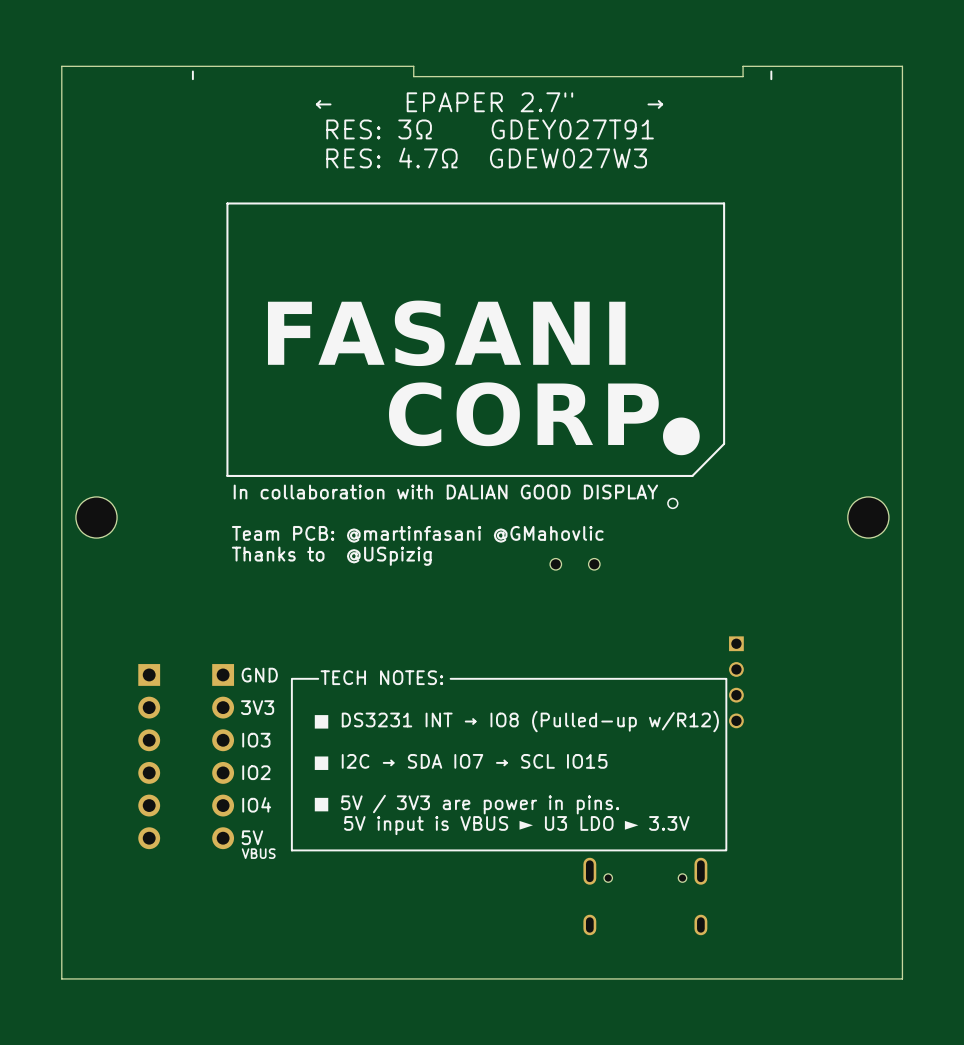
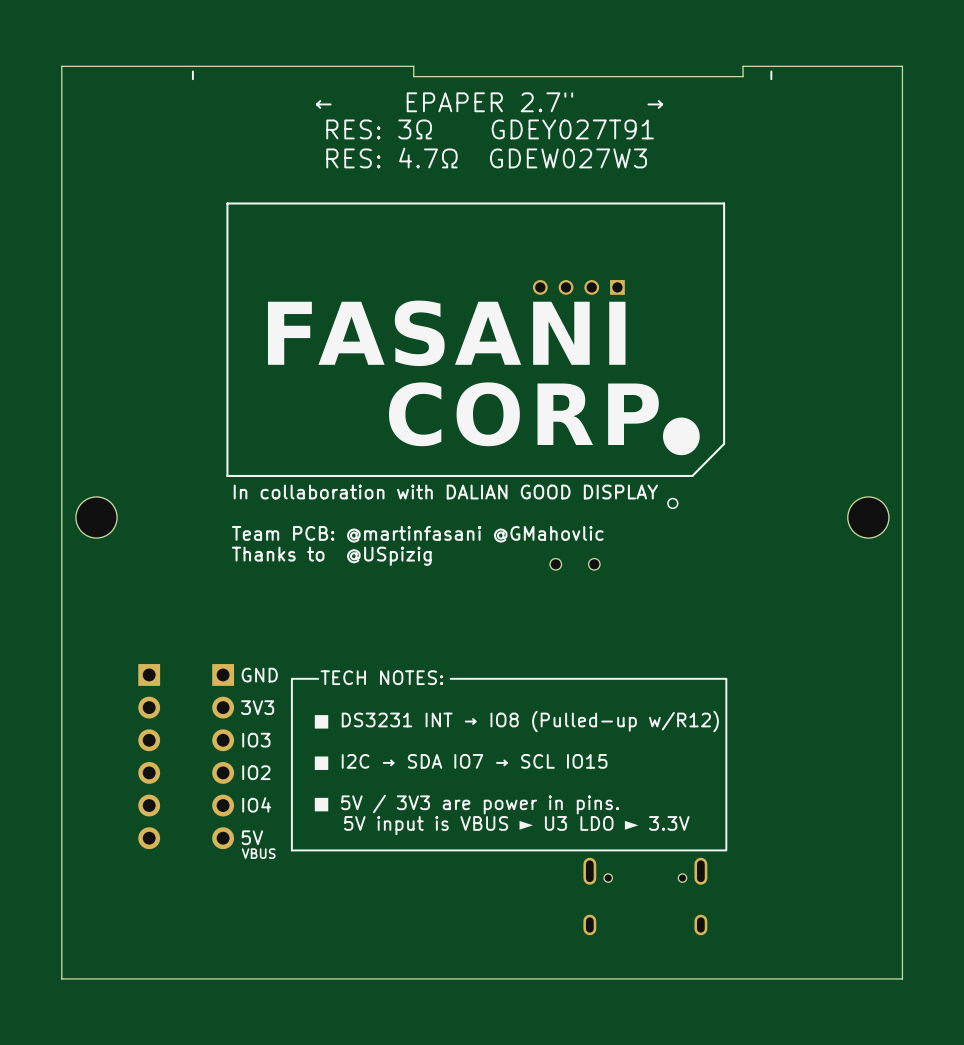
part: none -> (578, 287)
part: (736, 682) -> none

